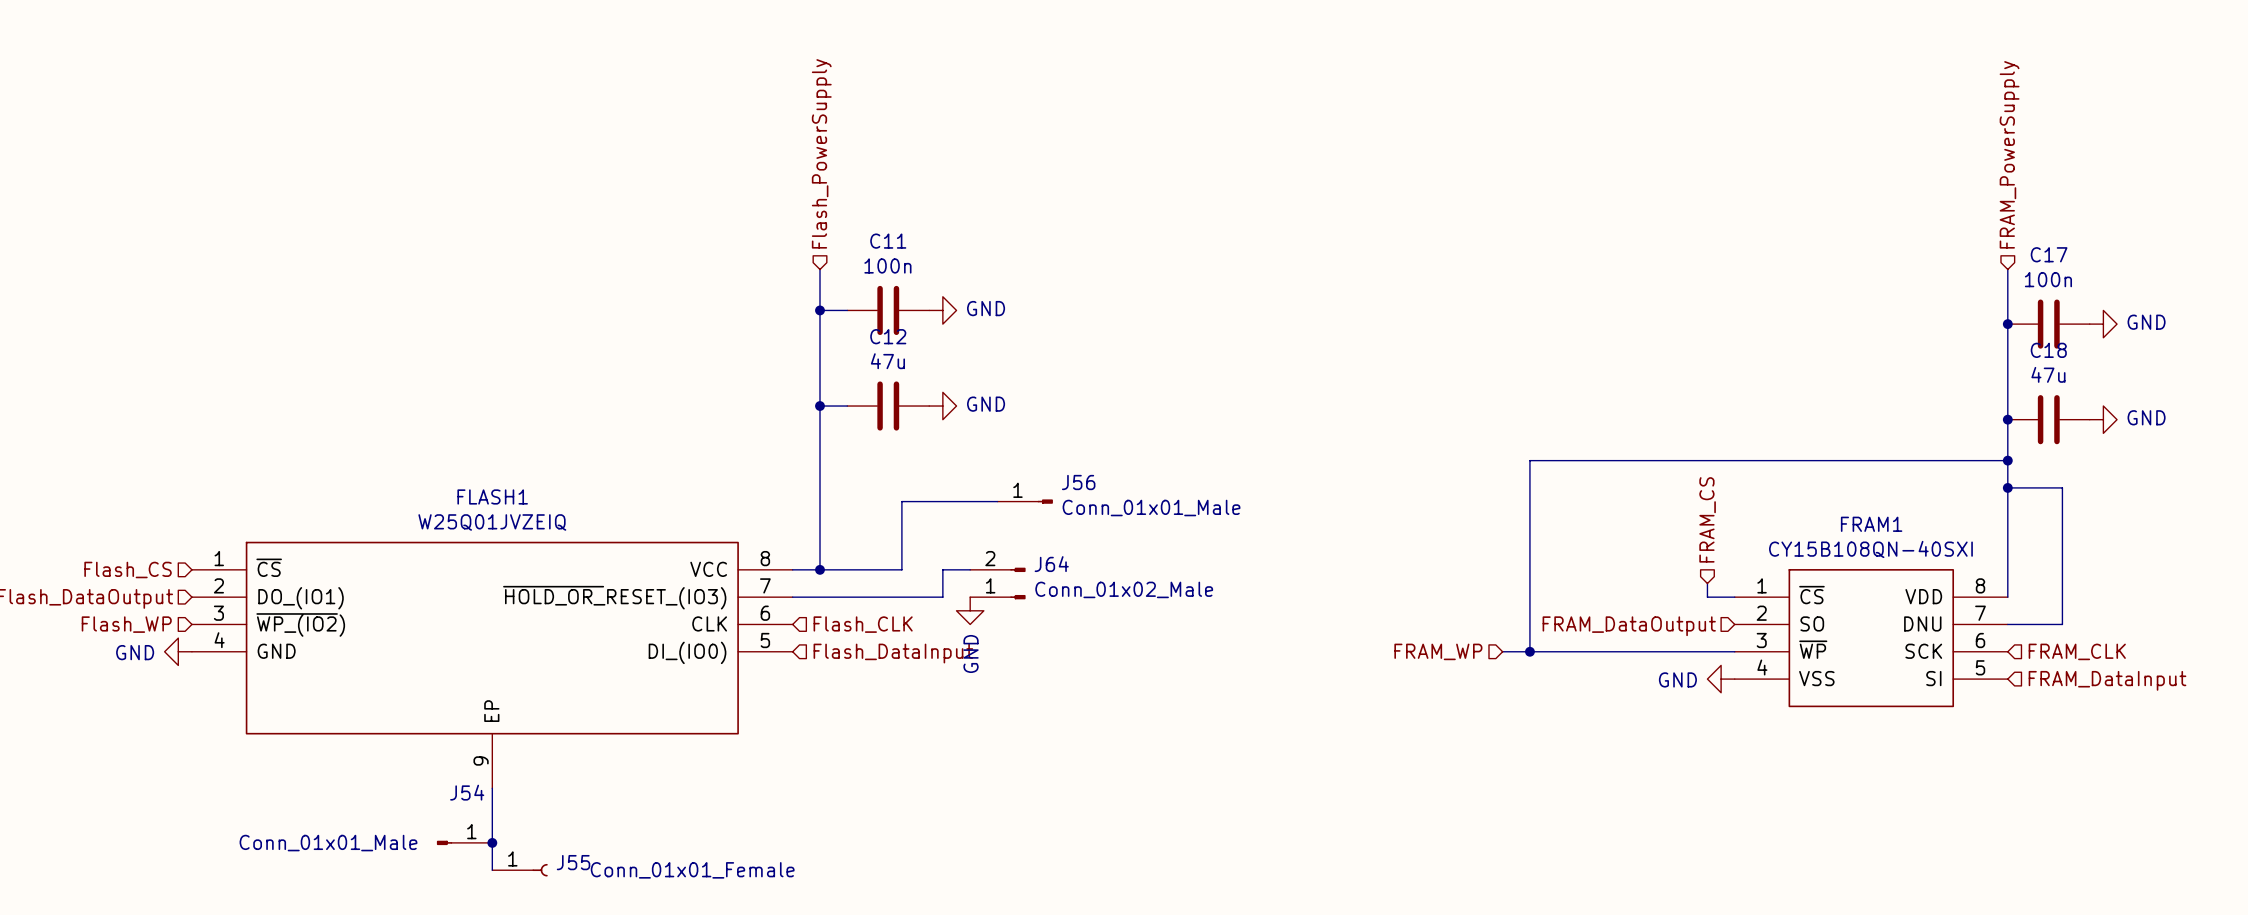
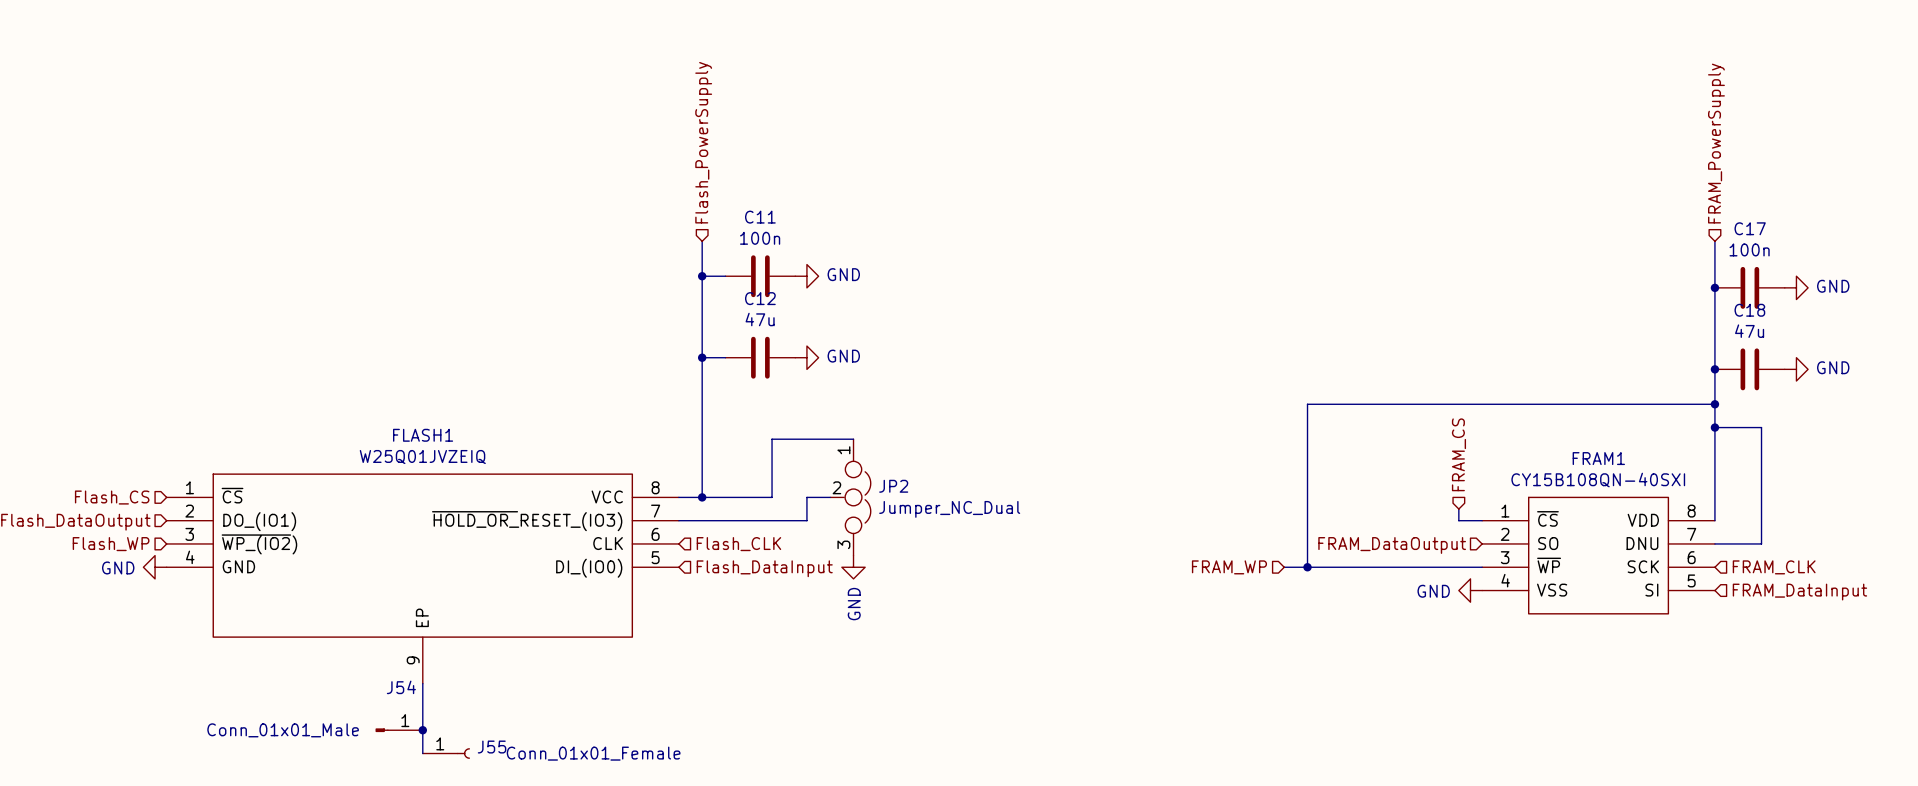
J56: Conn_01x01_Male (1025, 501) -> none
JP2: none -> Jumper_NC_Dual (850, 497)
J64: Conn_01x02_Male (997, 583) -> none
power symbol position: GND (970, 610) -> GND (853, 567)

